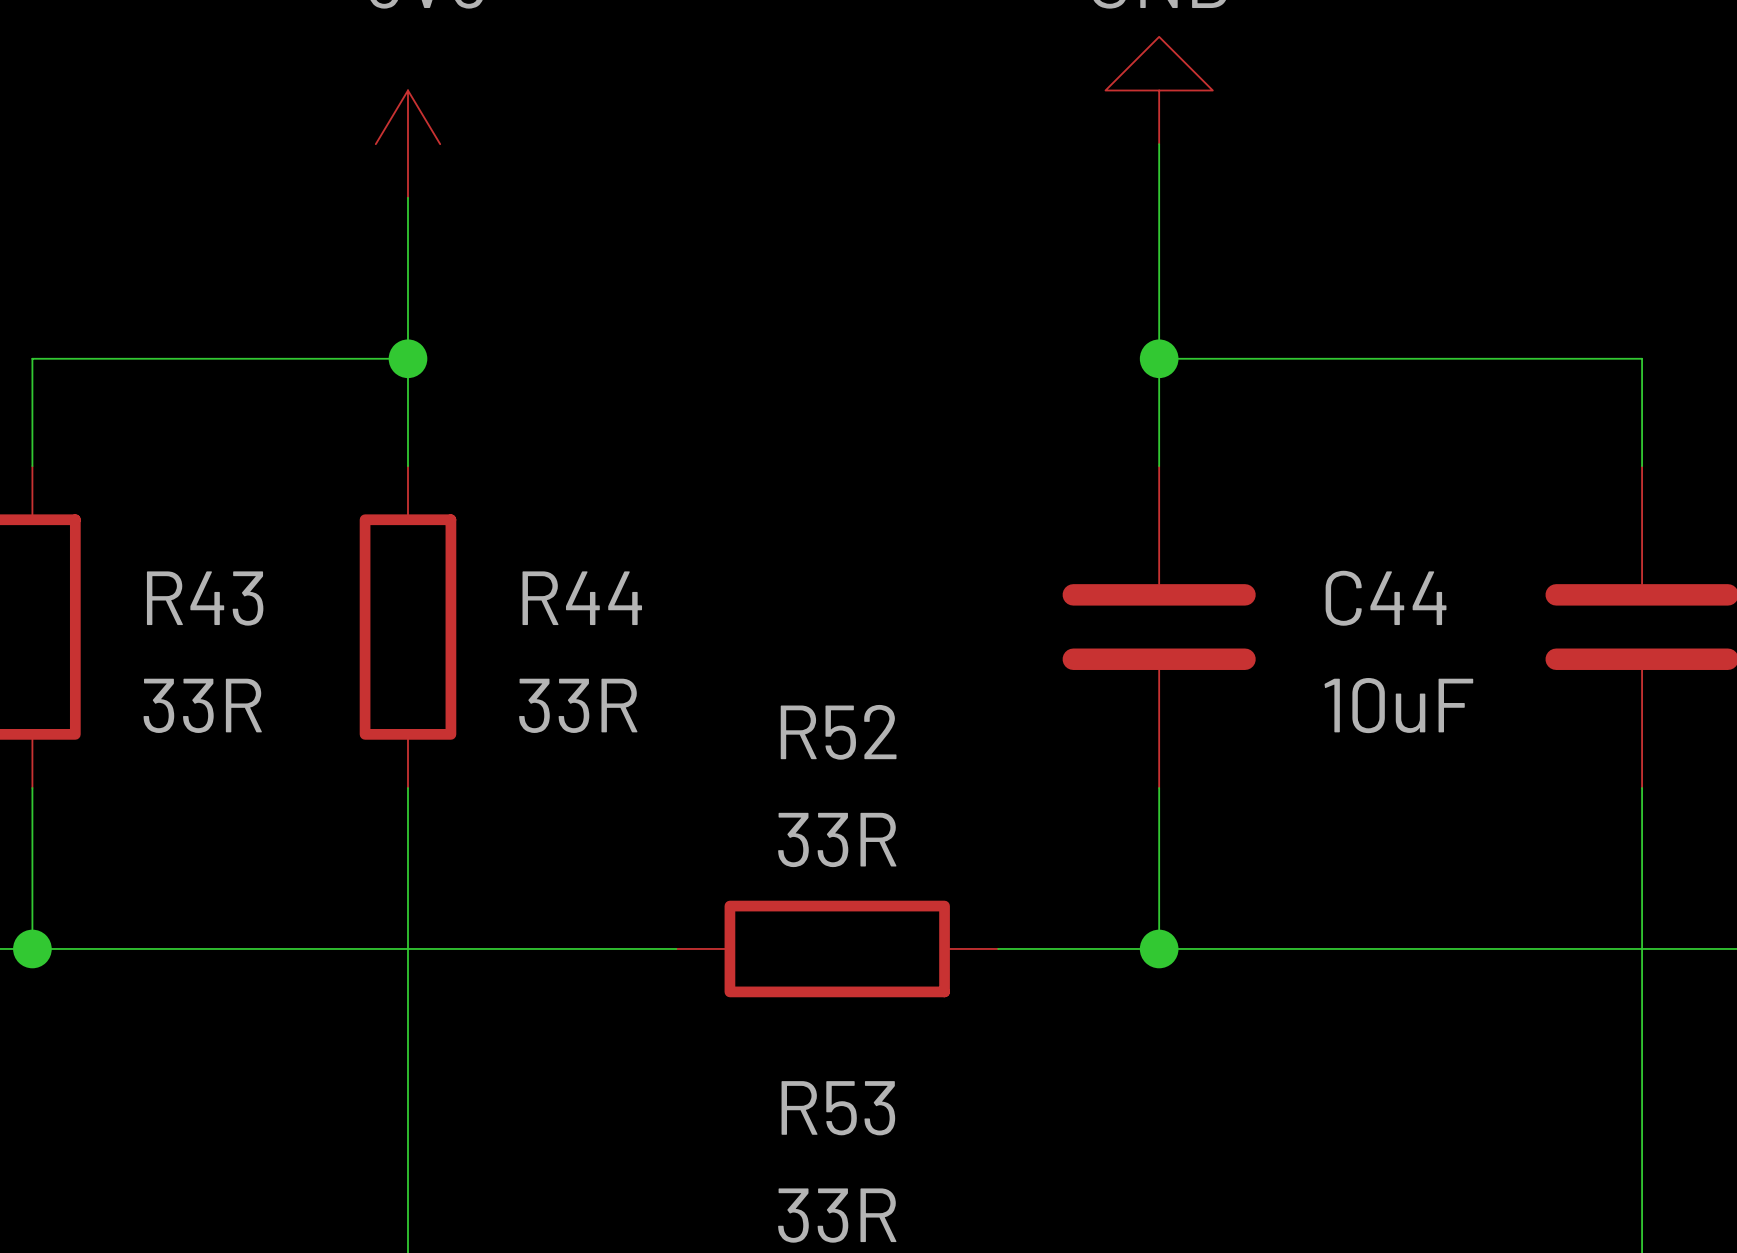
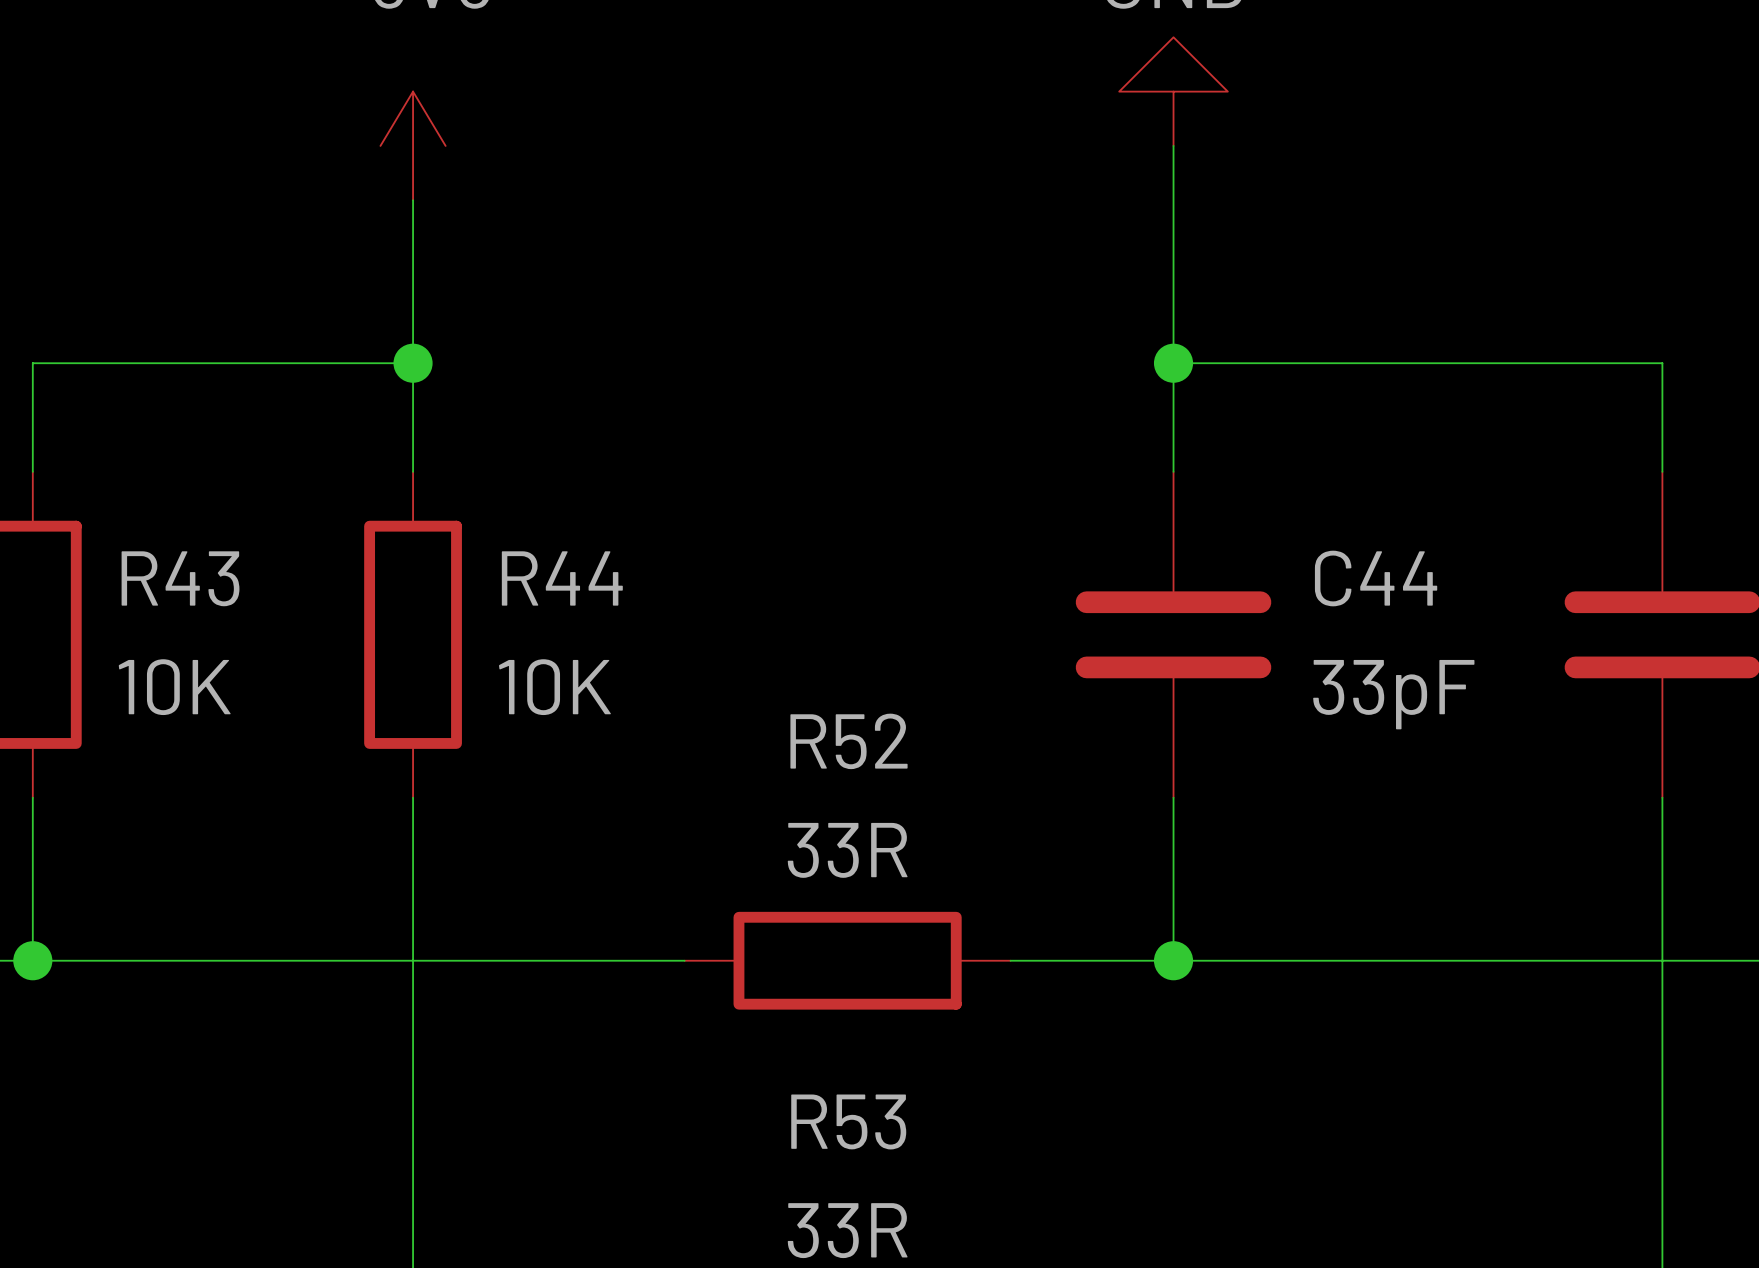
R43 name position: R43 (205, 598) -> R43 (180, 578)
R44 name position: R44 (582, 598) -> R44 (562, 578)
C44 name position: C44 (1386, 598) -> C44 (1376, 578)
R43 value: 33R (202, 705) -> 10K (174, 687)
R44 value: 33R (578, 705) -> 10K (554, 687)
C44 value: 10uF (1398, 705) -> 33pF (1393, 694)

